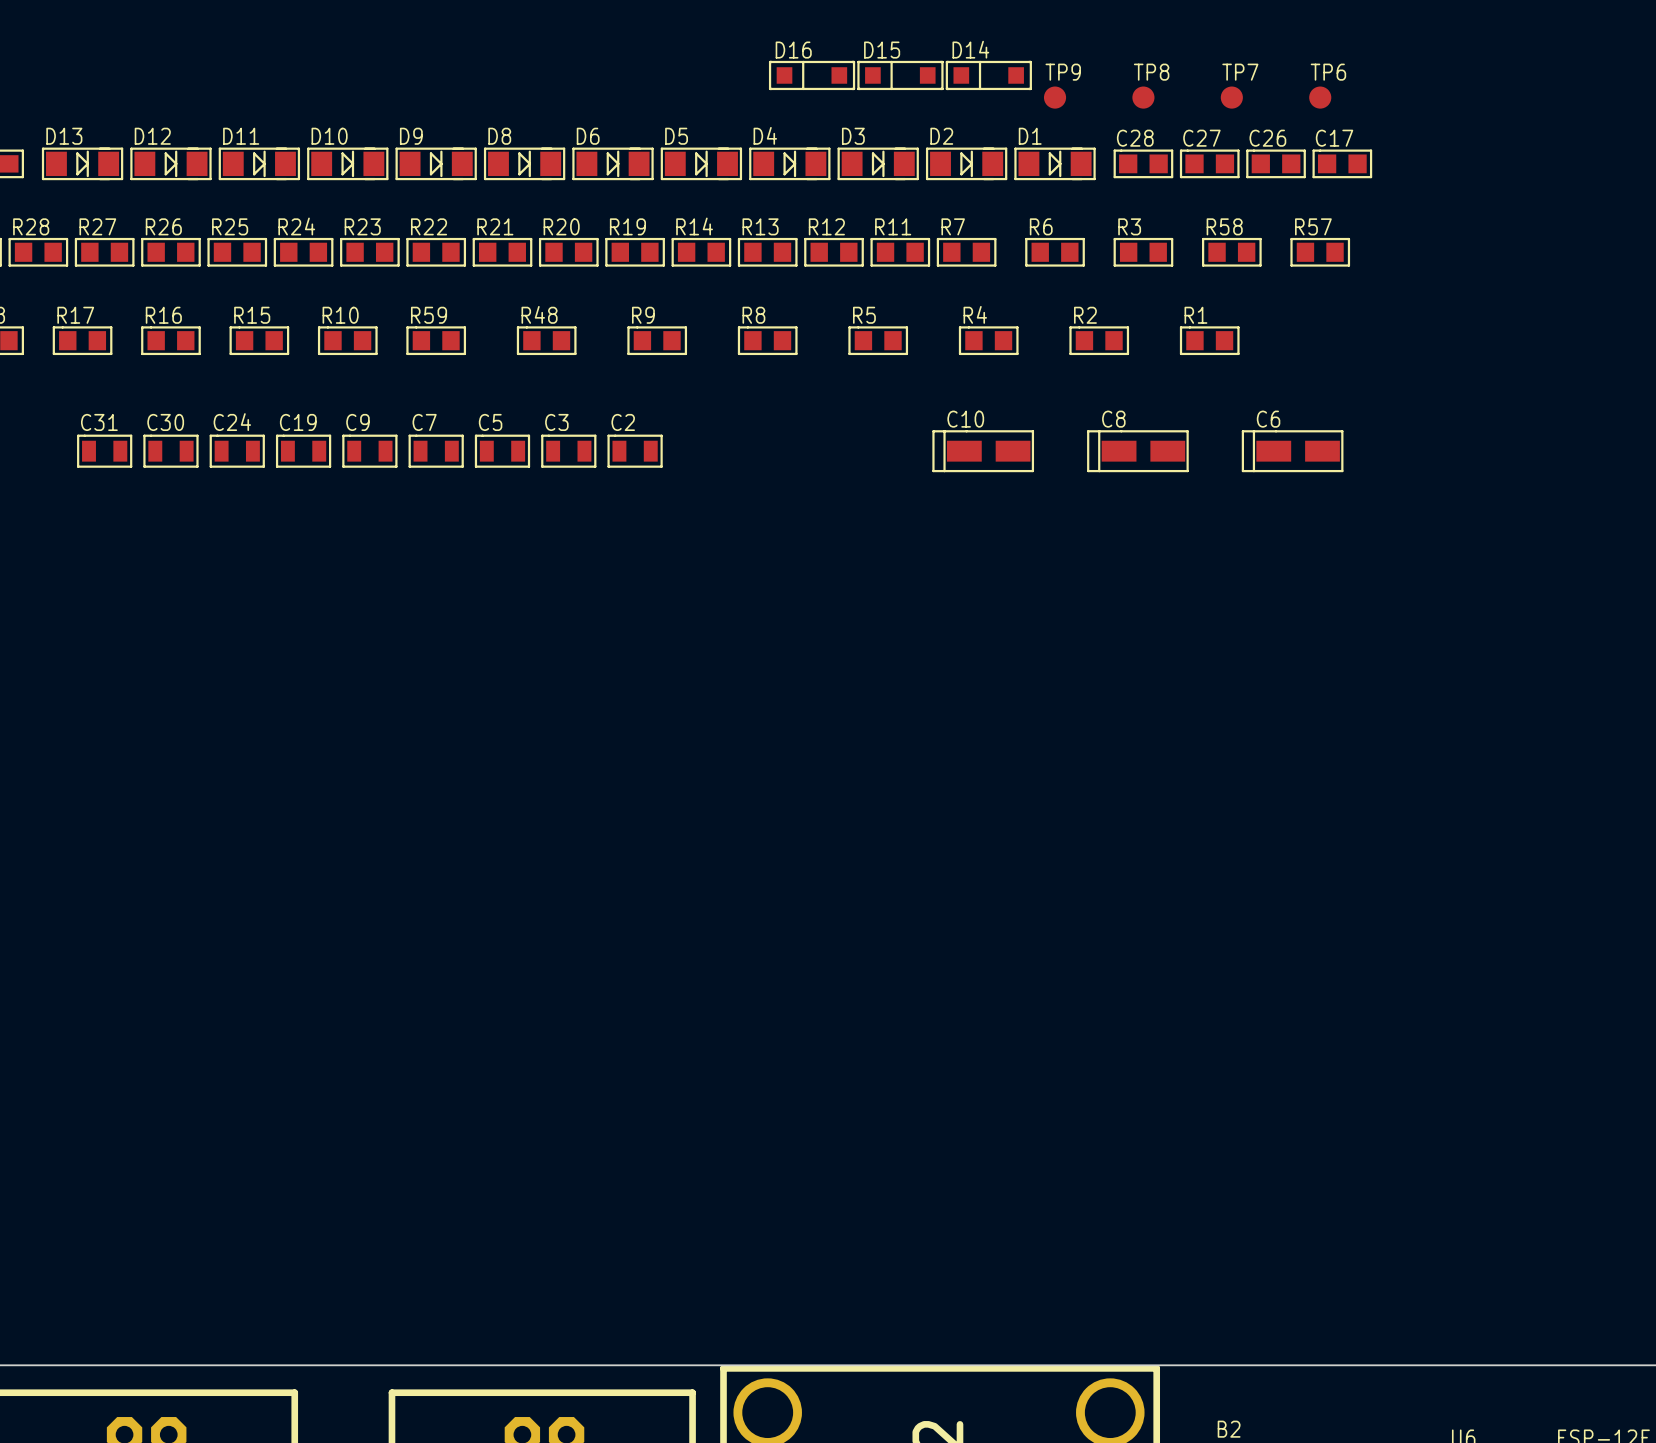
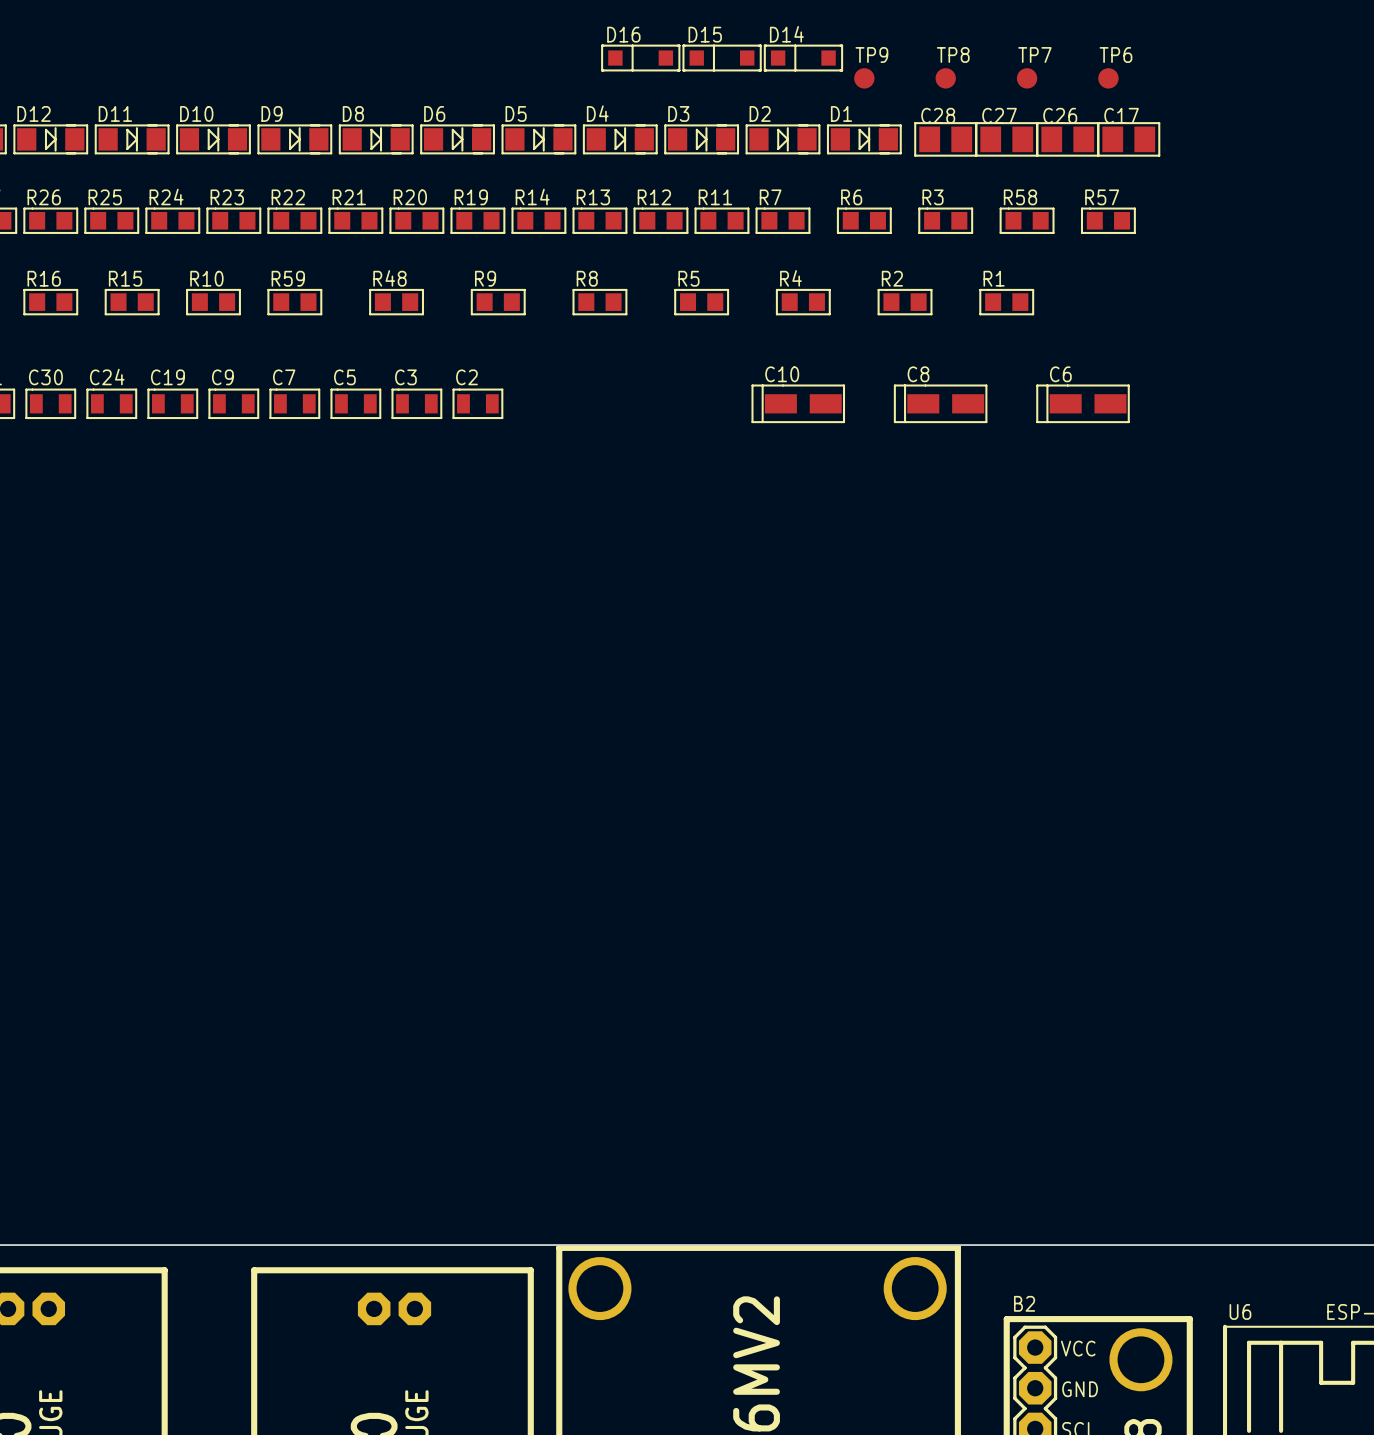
C28 footprint: [1113, 149, 1174, 179] -> [914, 122, 978, 157]
C27 footprint: [1179, 149, 1240, 179] -> [975, 122, 1039, 157]
C26 footprint: [1246, 149, 1306, 179] -> [1036, 122, 1100, 157]
C17 footprint: [1312, 149, 1373, 179] -> [1097, 122, 1161, 157]

